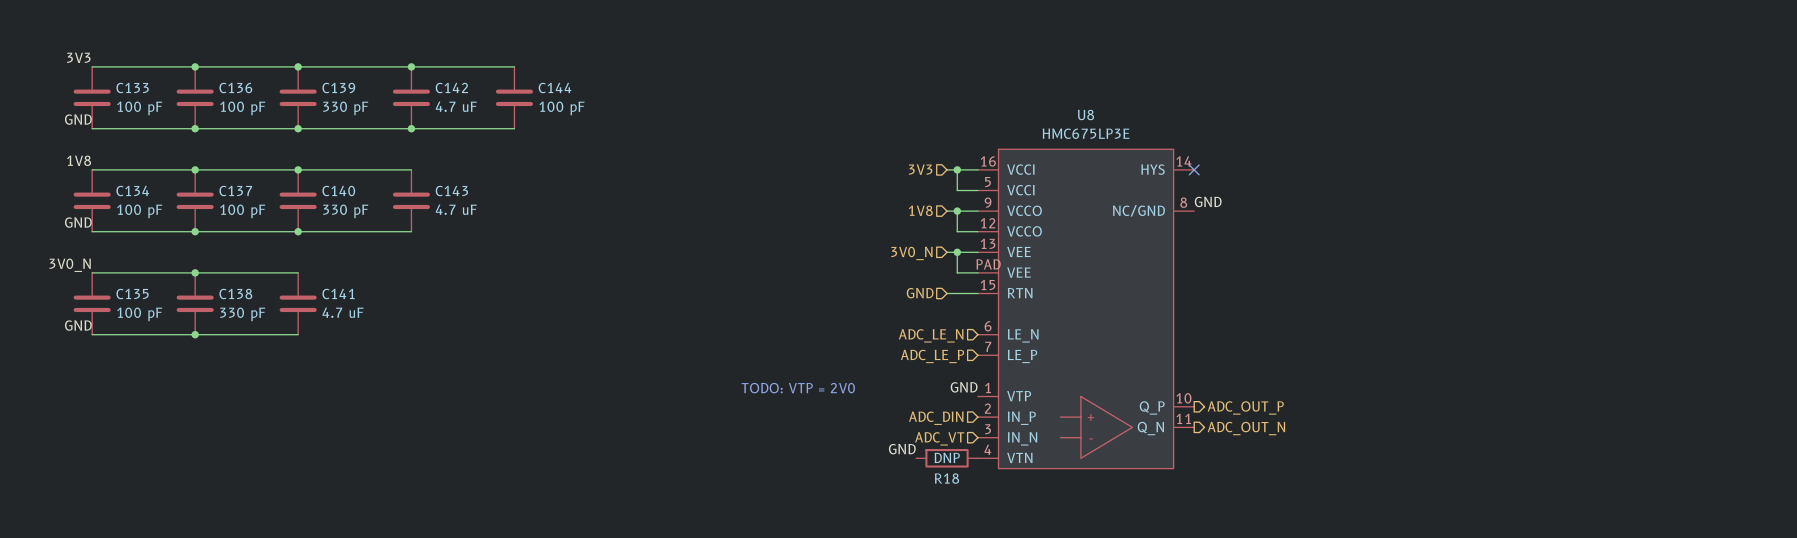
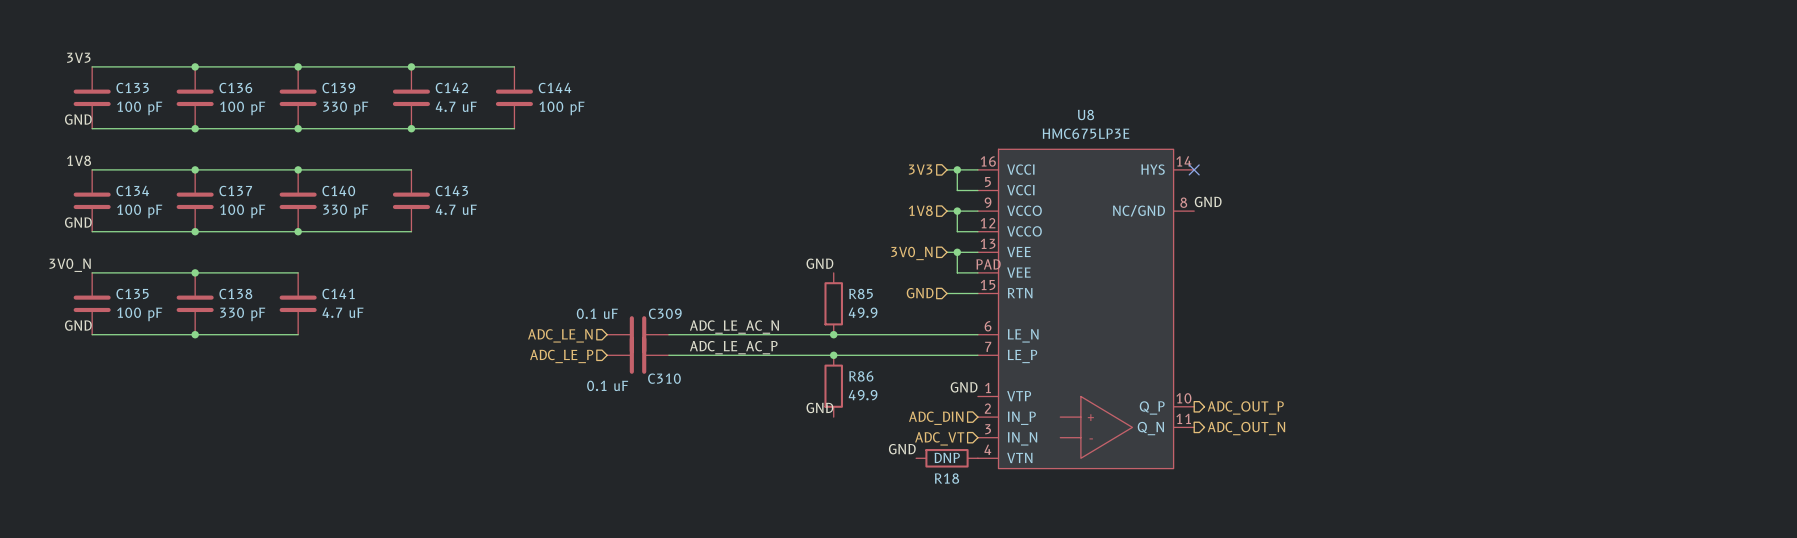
label: none -> GND (819, 263)
R85: none -> 49.9 (833, 303)
label: none -> ADC_LE_AC_N (734, 327)
C309: none -> 0.1 uF (638, 334)
wire: none -> (668, 334) (977, 334)
junction: none -> (833, 334)
hierarchical label: none -> ADC_LE_N (560, 335)
hierarchical label: ADC_LE_N (931, 335) -> none
label: none -> ADC_LE_AC_P (733, 347)
C310: none -> 0.1 uF (638, 355)
wire: none -> (668, 355) (977, 355)
junction: none -> (833, 355)
hierarchical label: none -> ADC_LE_P (561, 356)
hierarchical label: ADC_LE_P (932, 356) -> none
R86: none -> 49.9 (833, 386)
text: TODO: VTP = 2V0 (798, 388) -> none
label: none -> GND (819, 407)

